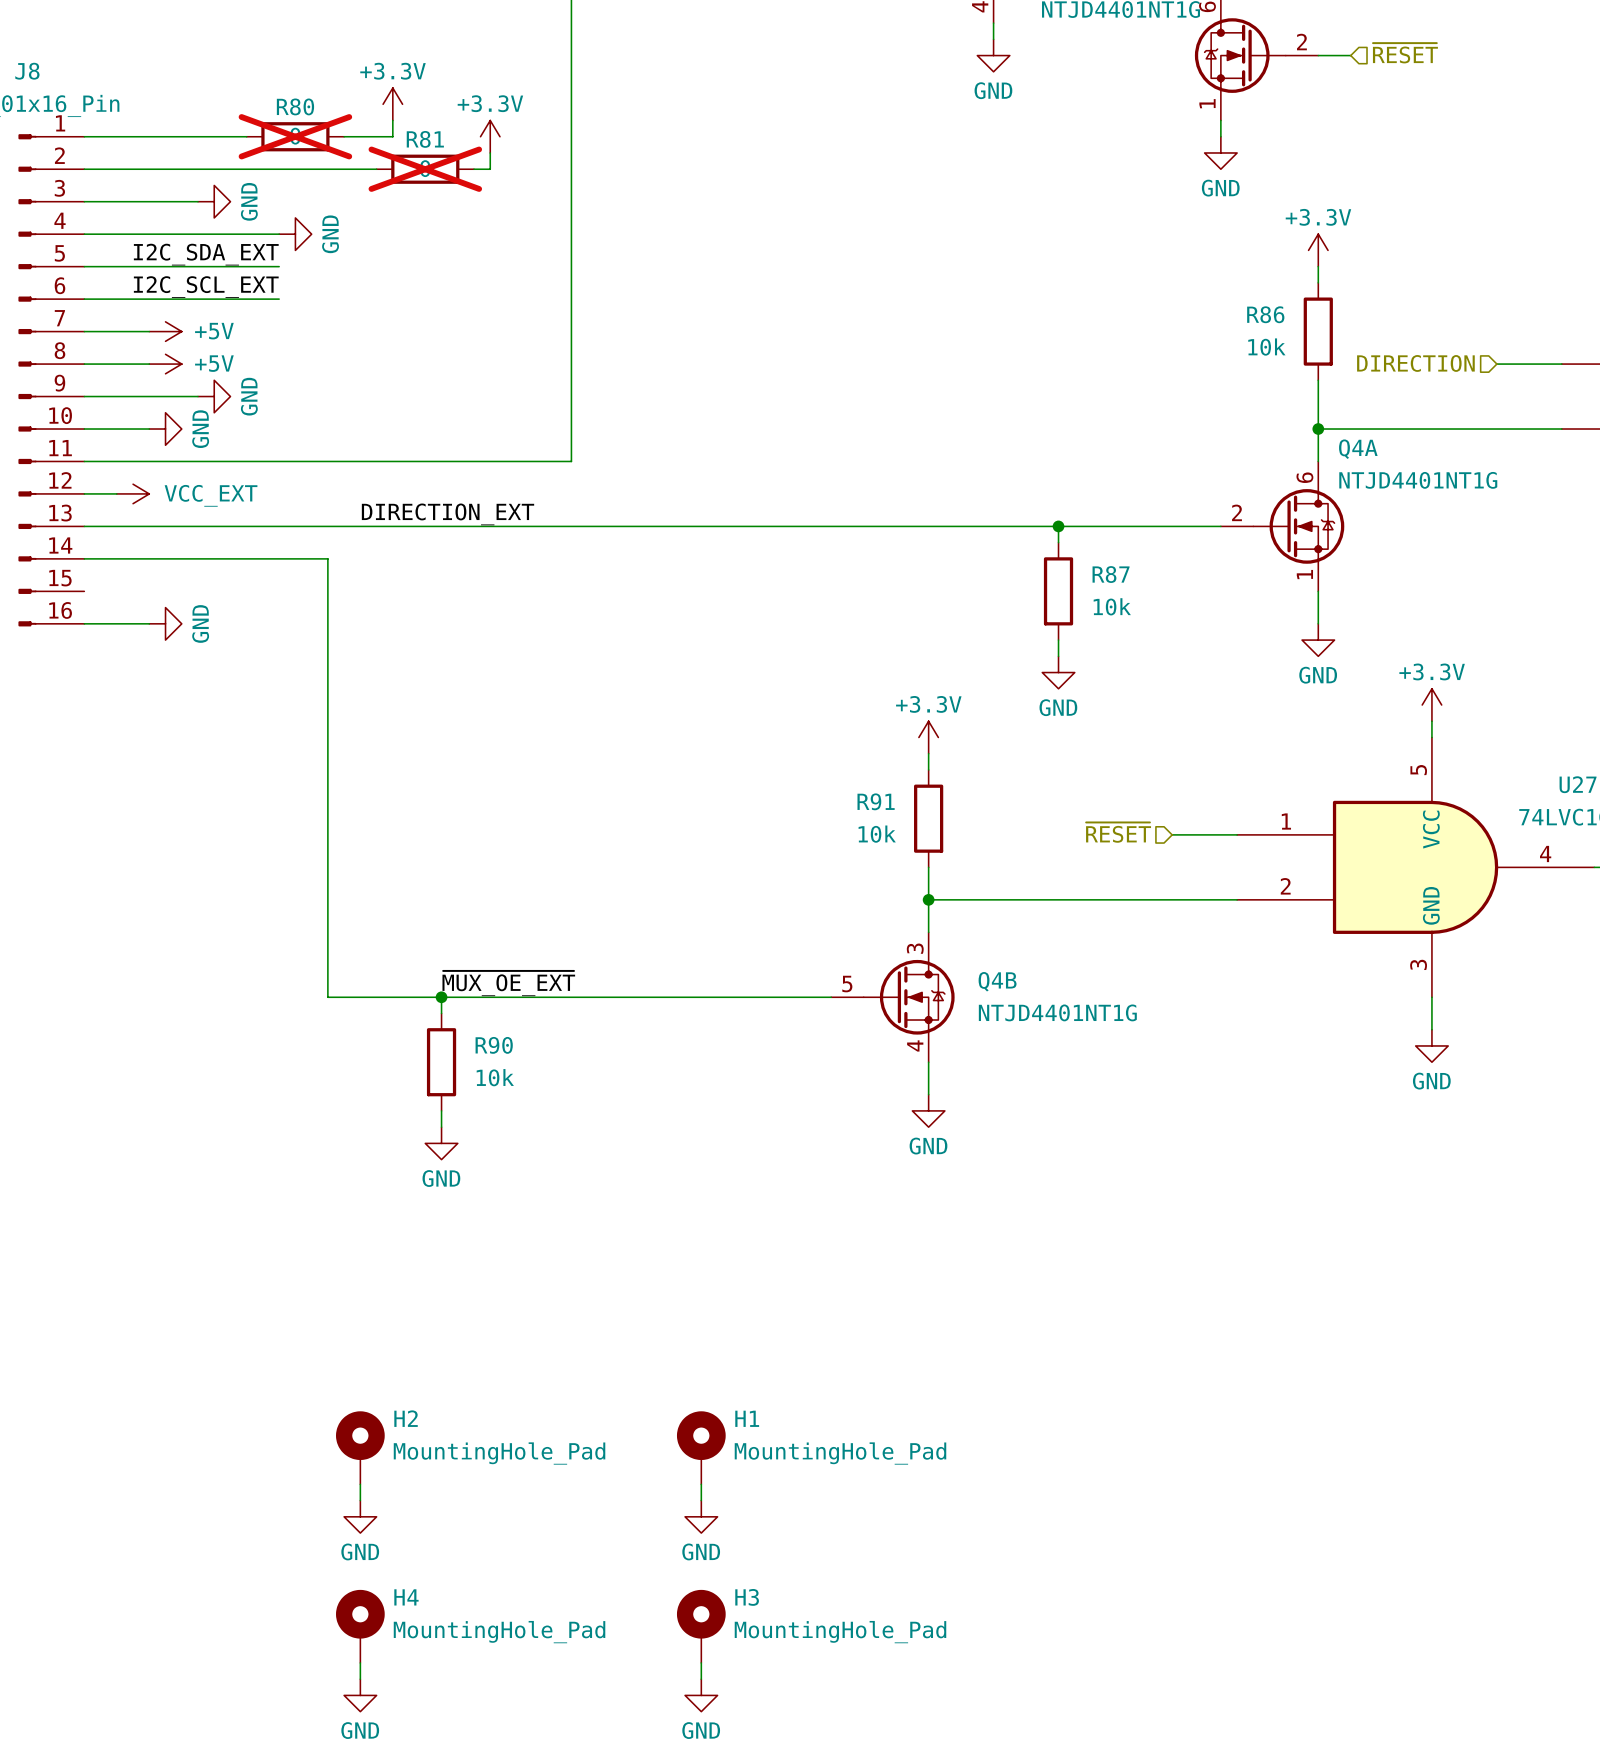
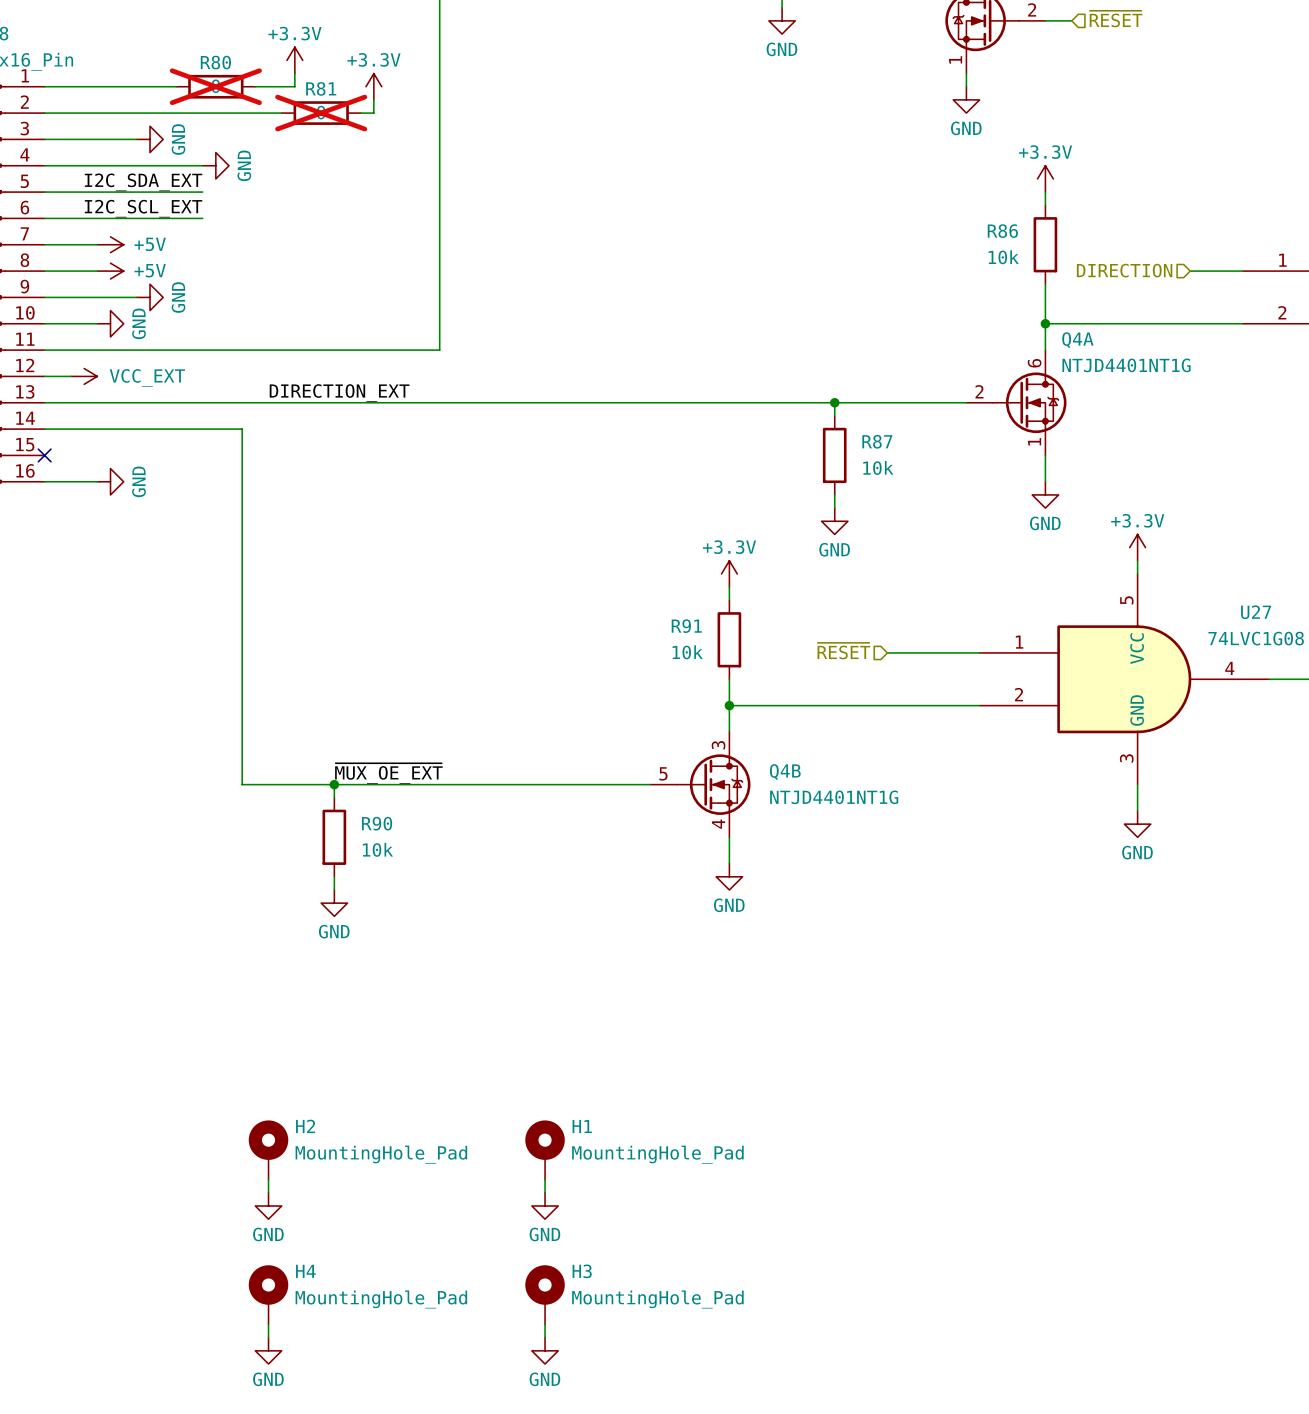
no-connect mark: none -> (44, 455)
hierarchical label position: ~{RESET} (1118, 832) -> ~{RESET} (843, 651)
wire: none -> (887, 652) (926, 652)

